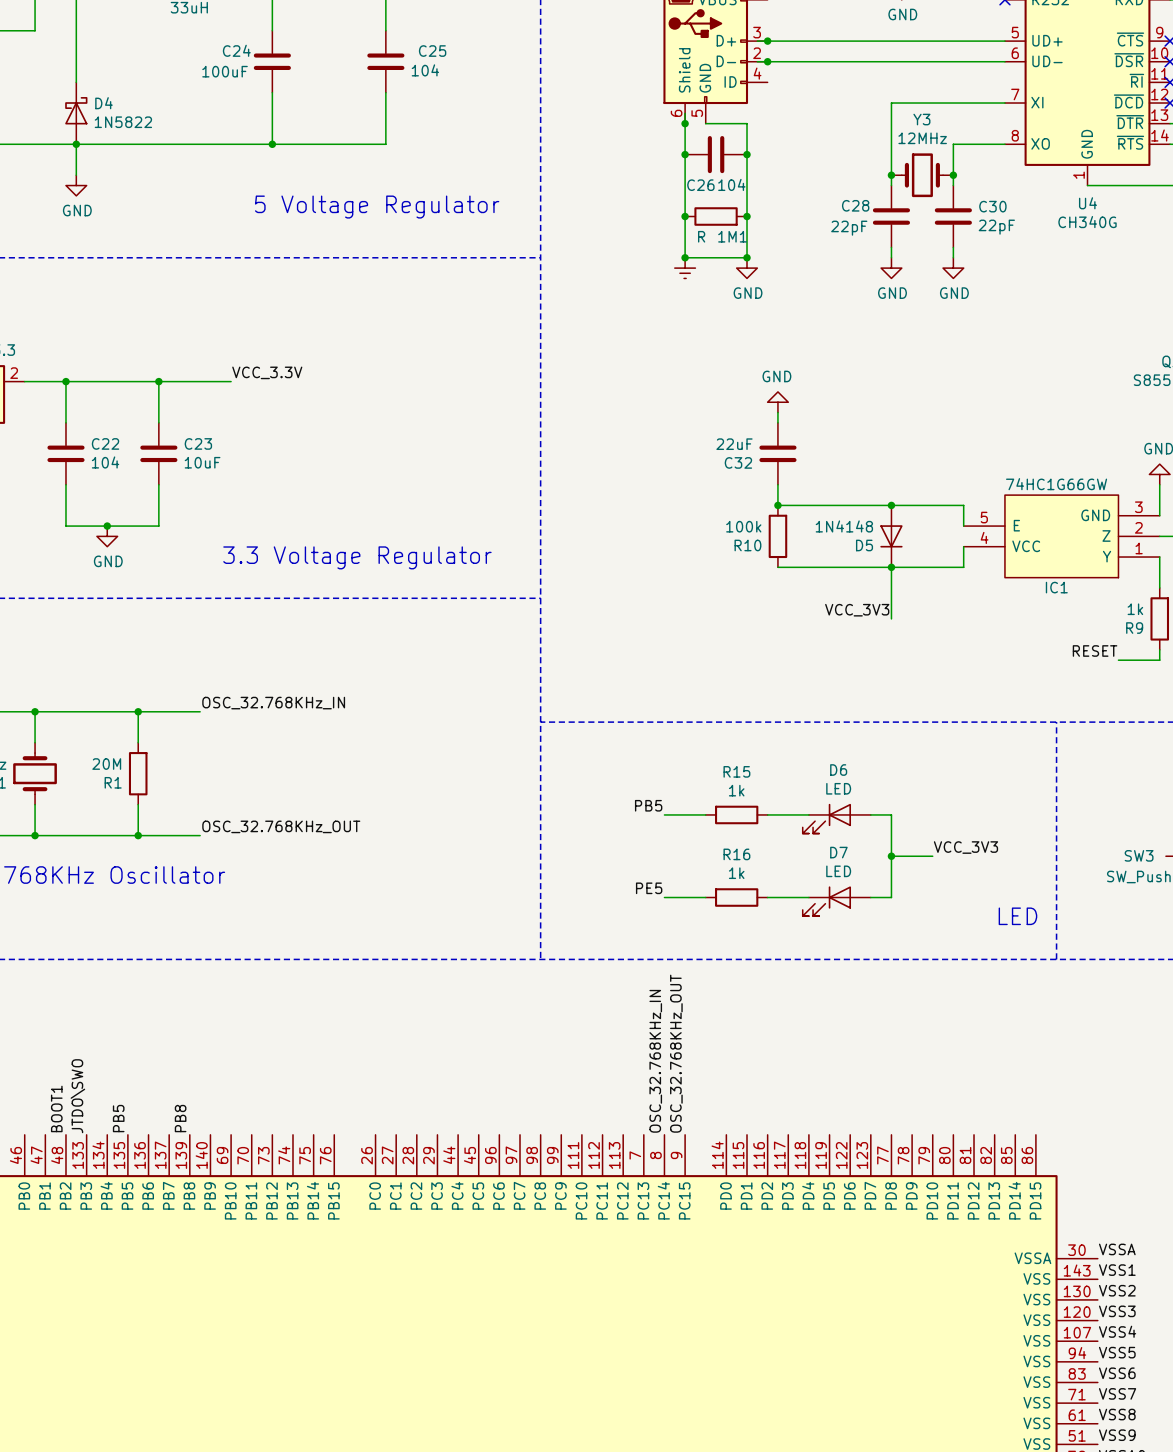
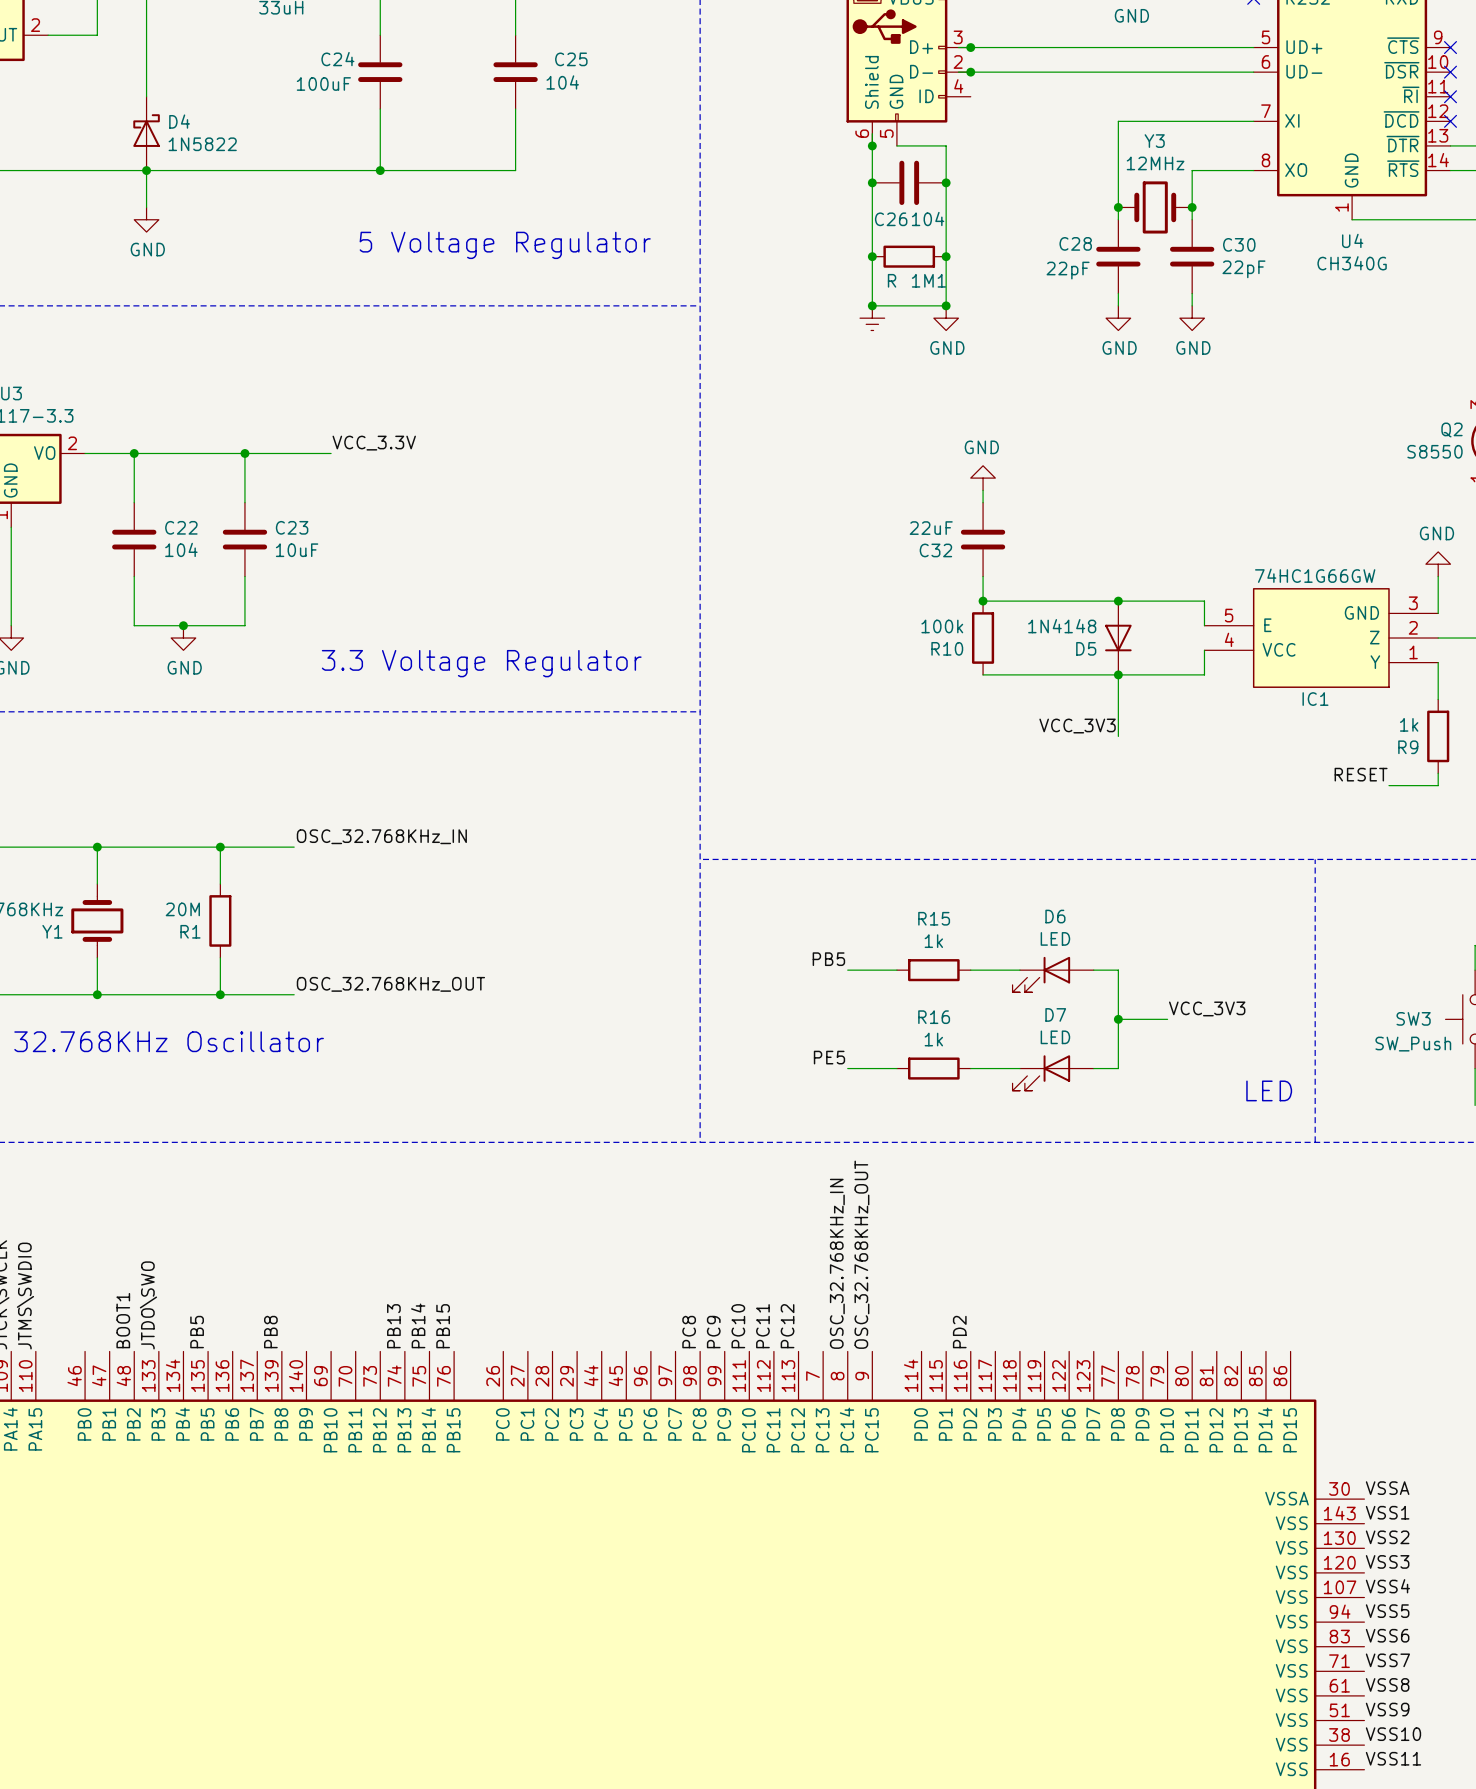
label: none -> PB13 (393, 1326)
label: none -> PB14 (418, 1325)
label: none -> PB15 (443, 1326)
label: none -> PC10 (738, 1326)
label: none -> PC11 (762, 1326)
label: none -> PC12 (787, 1326)
label: none -> PC8 (689, 1332)
label: none -> PC9 (713, 1332)
label: none -> PD2 (959, 1332)

